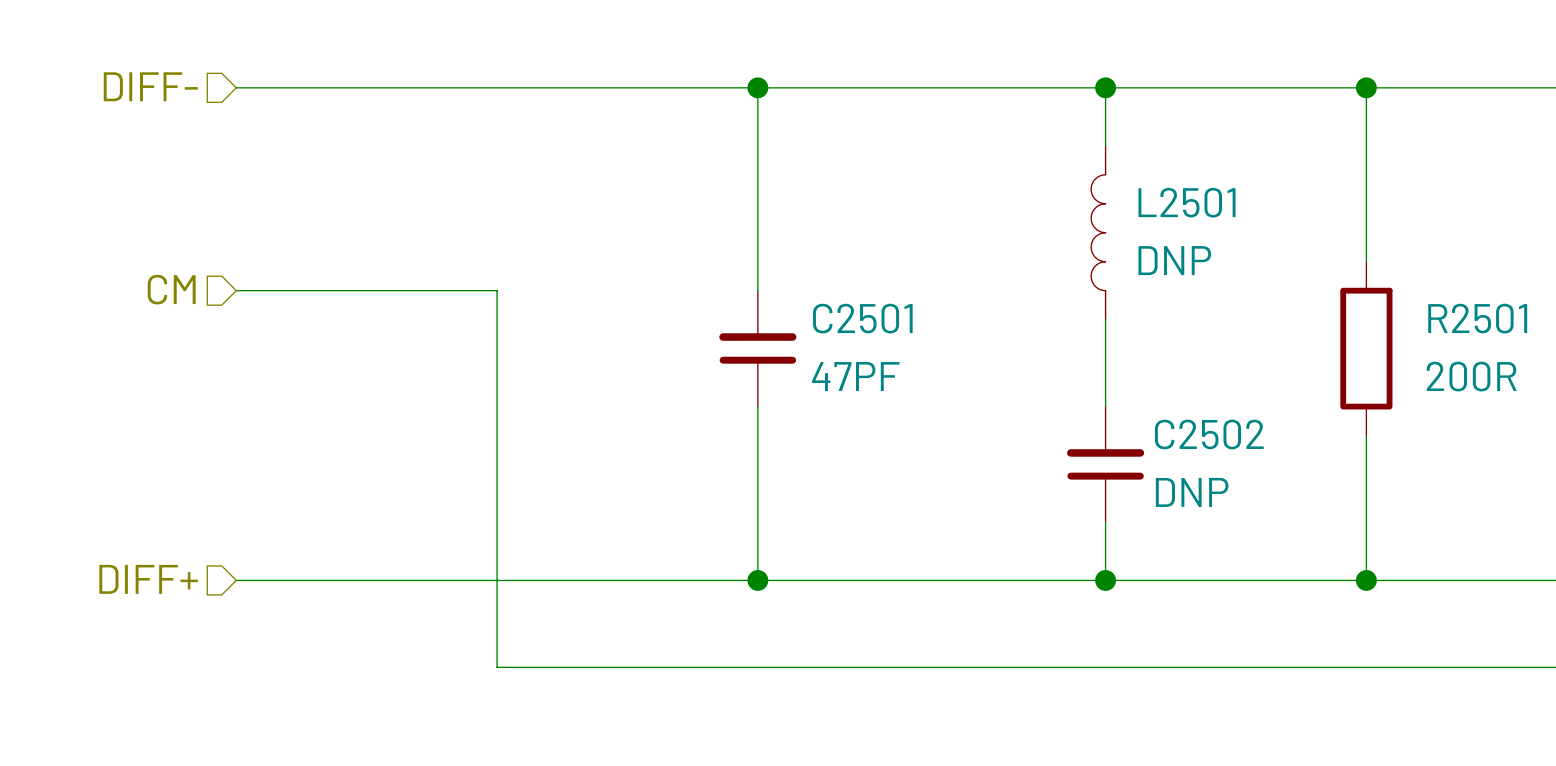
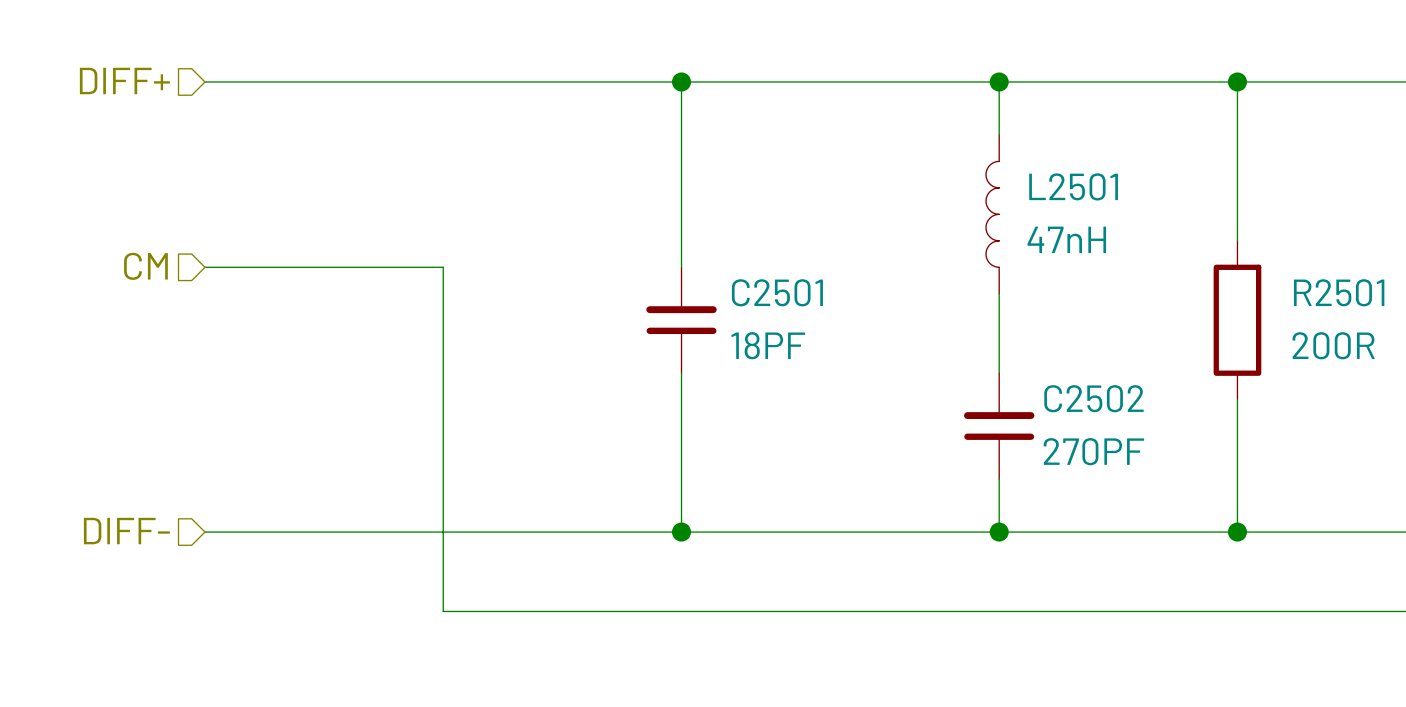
hierarchical label: DIFF- (150, 86) -> DIFF+ (124, 81)
L2501 value: DNP (1174, 260) -> 47nH (1066, 239)
C2501 value: 47PF (855, 376) -> 18PF (768, 345)
C2502 value: DNP (1192, 492) -> 270PF (1093, 451)
hierarchical label: DIFF+ (148, 579) -> DIFF- (126, 531)

